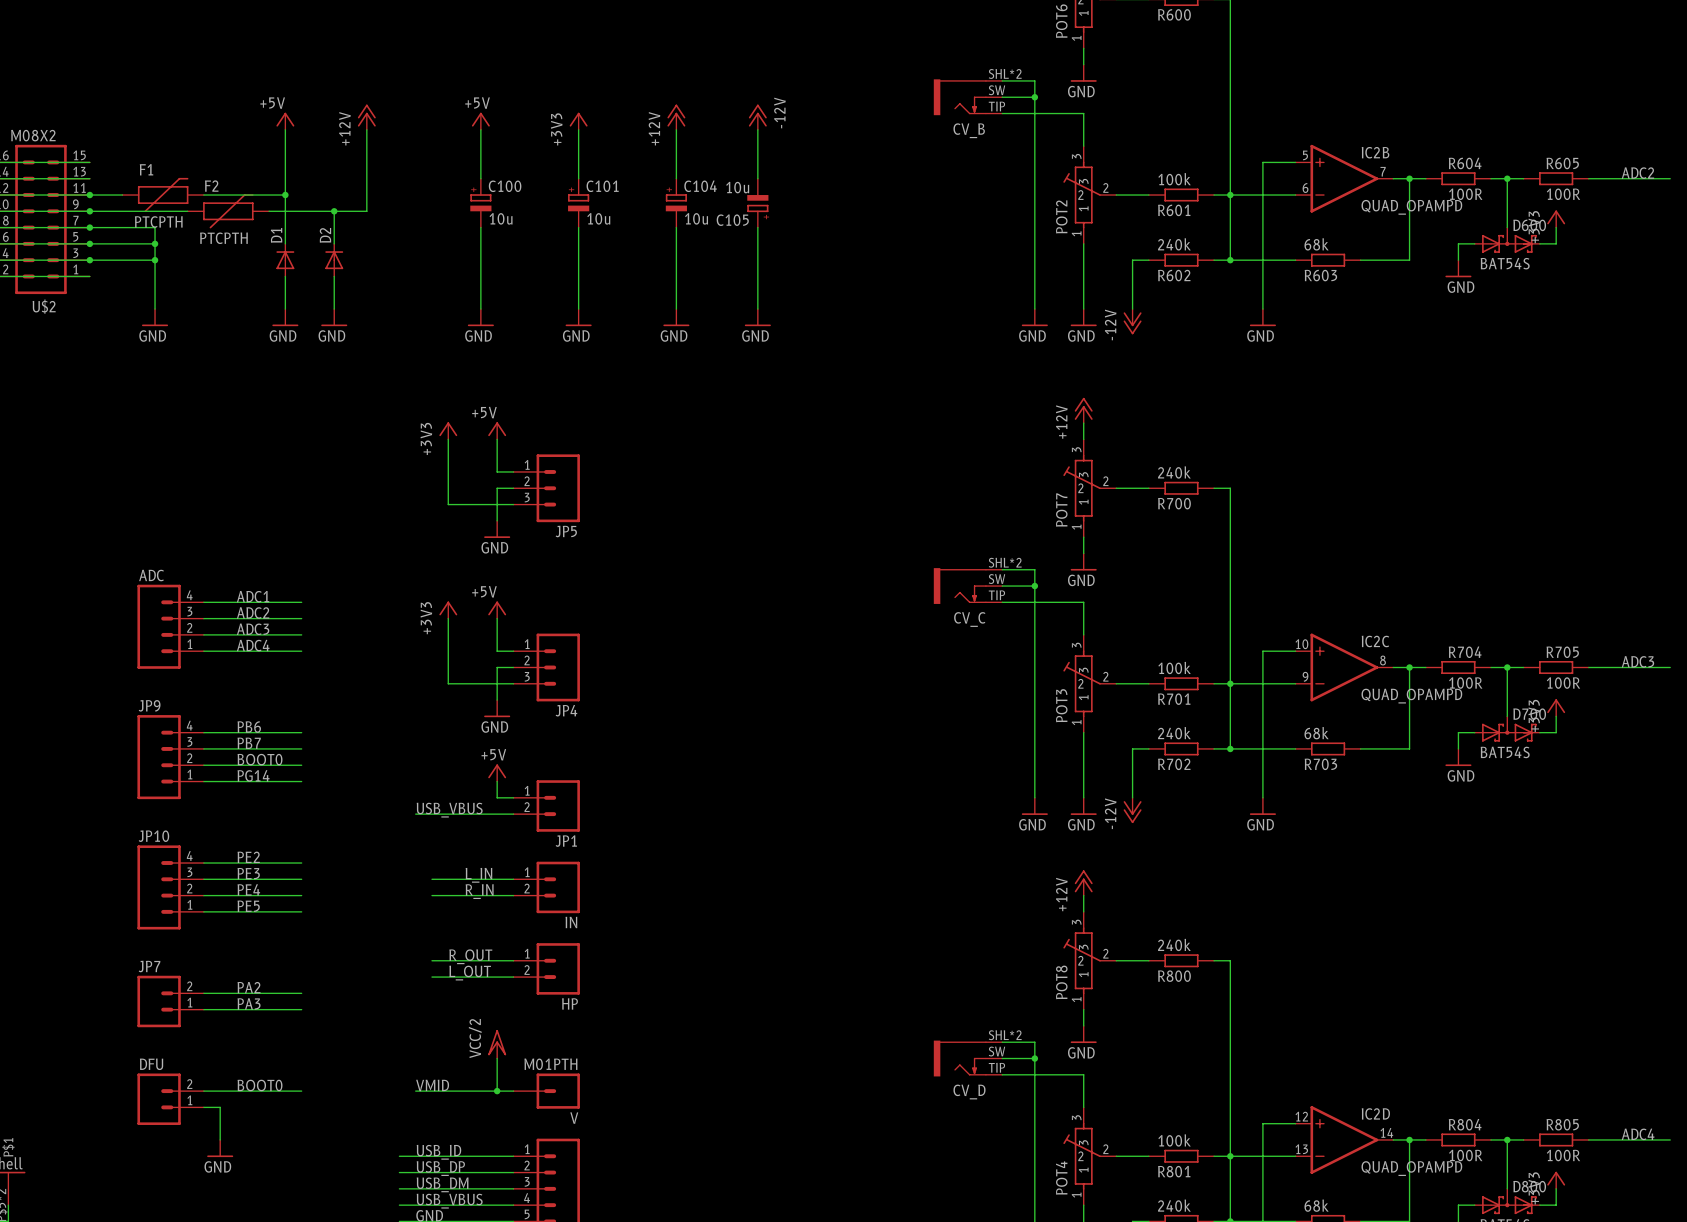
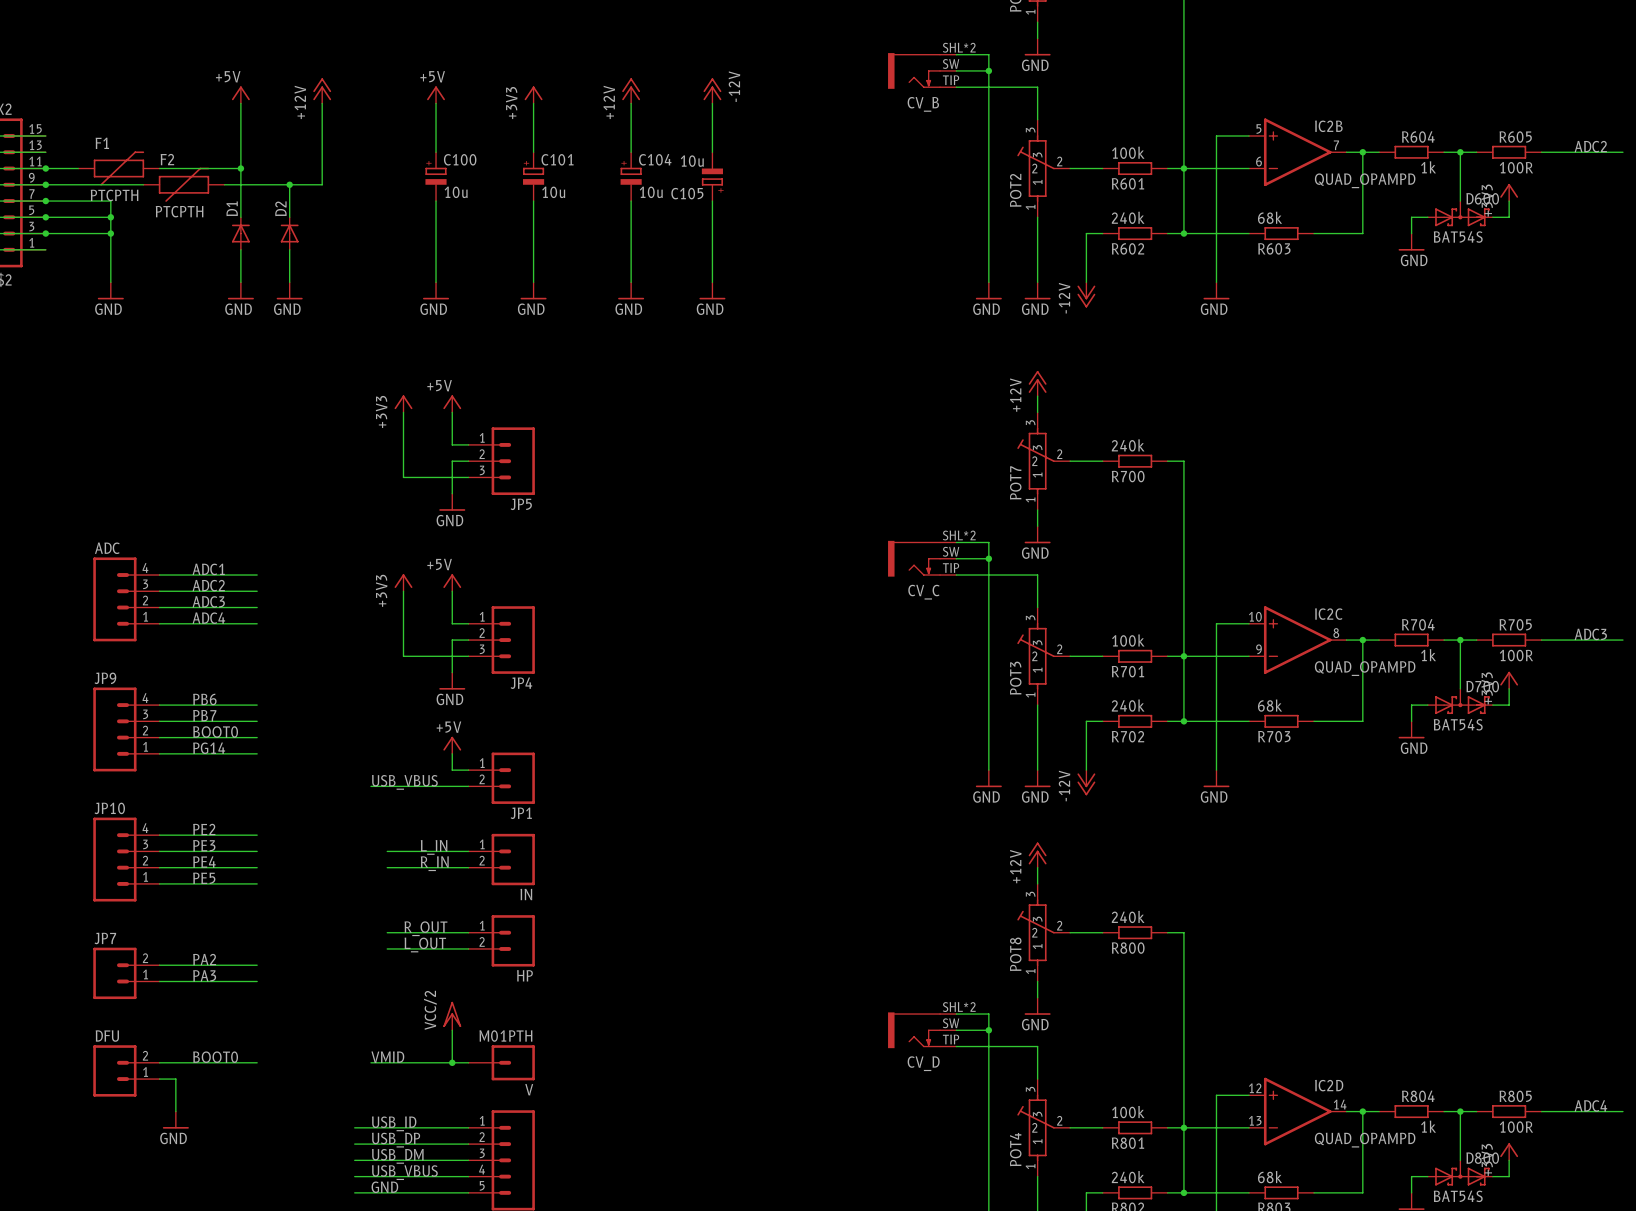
R604 value: 100R (1465, 194) -> 1k (1428, 167)
R704 value: 100R (1465, 683) -> 1k (1428, 655)
R804 value: 100R (1465, 1155) -> 1k (1428, 1126)

